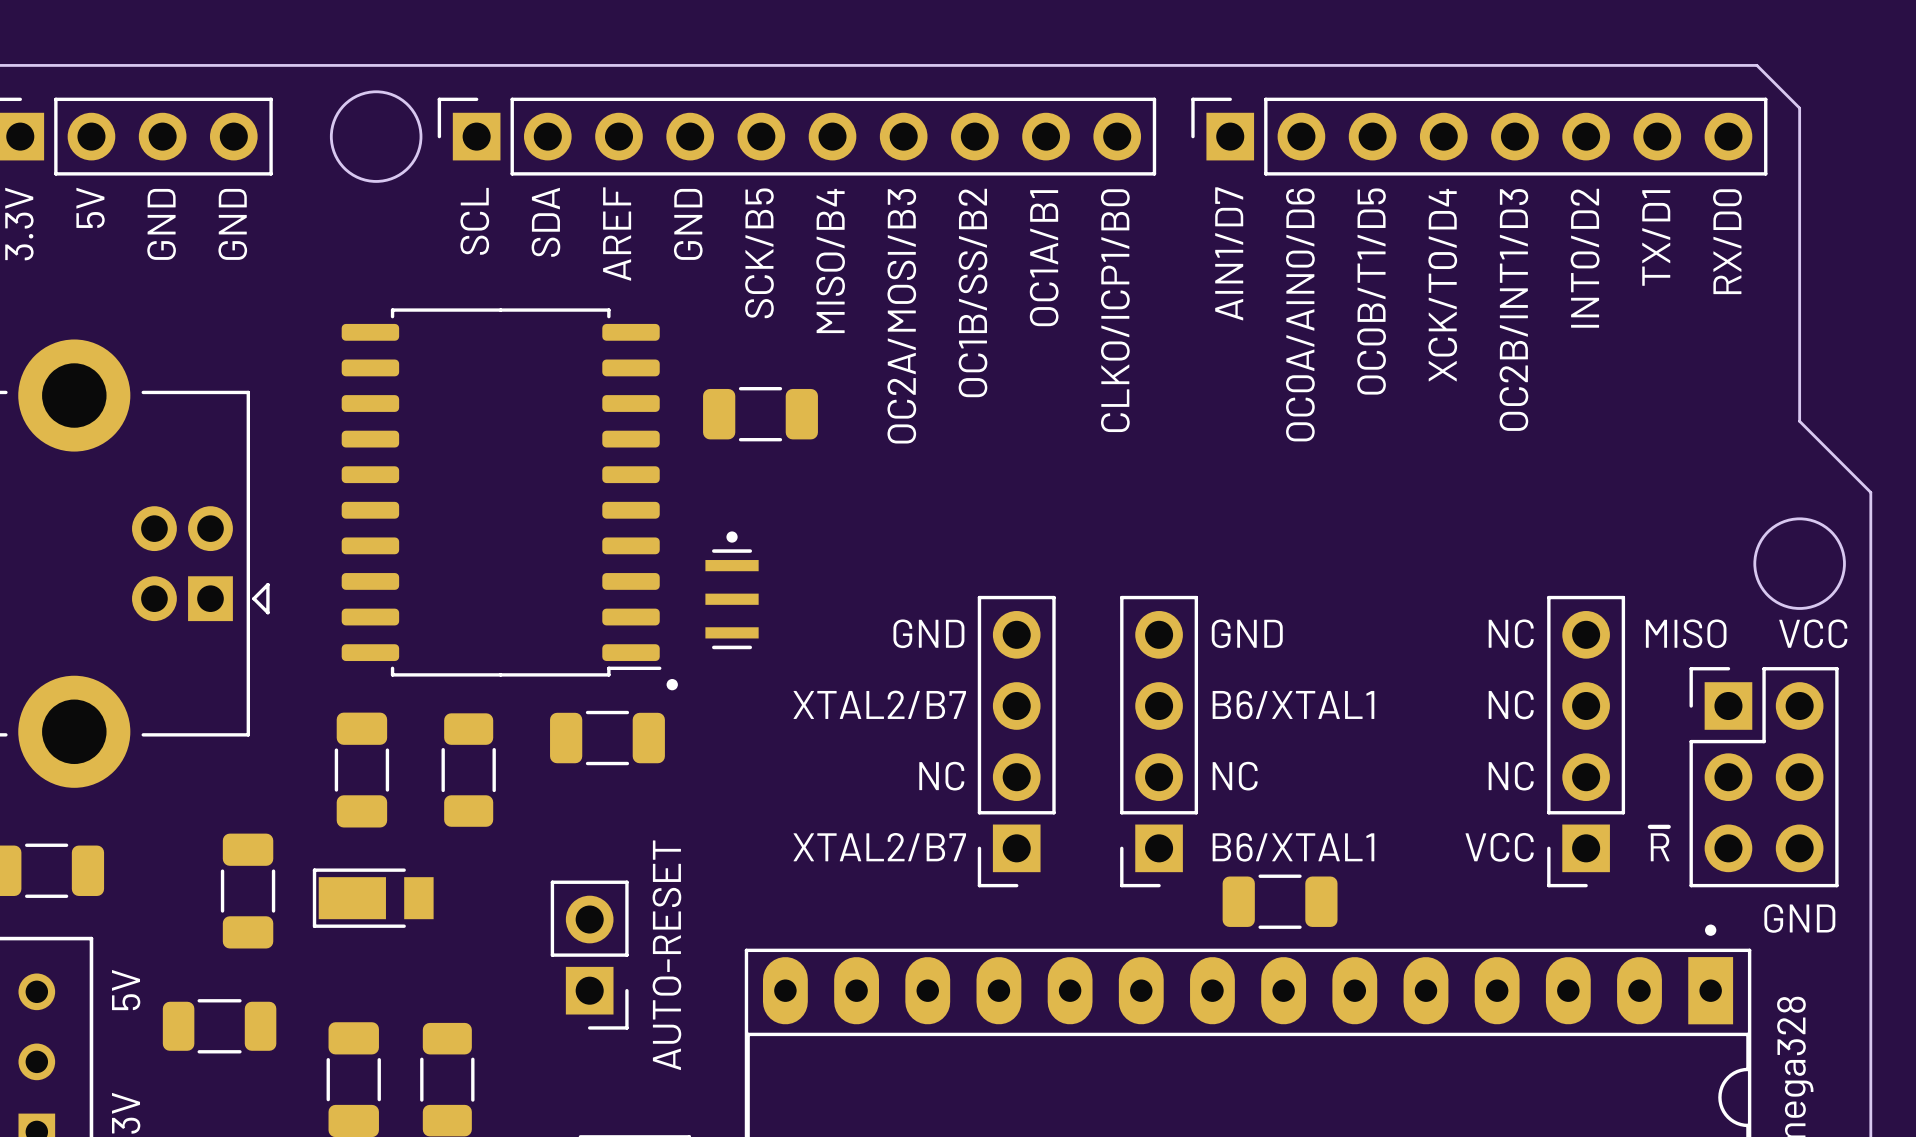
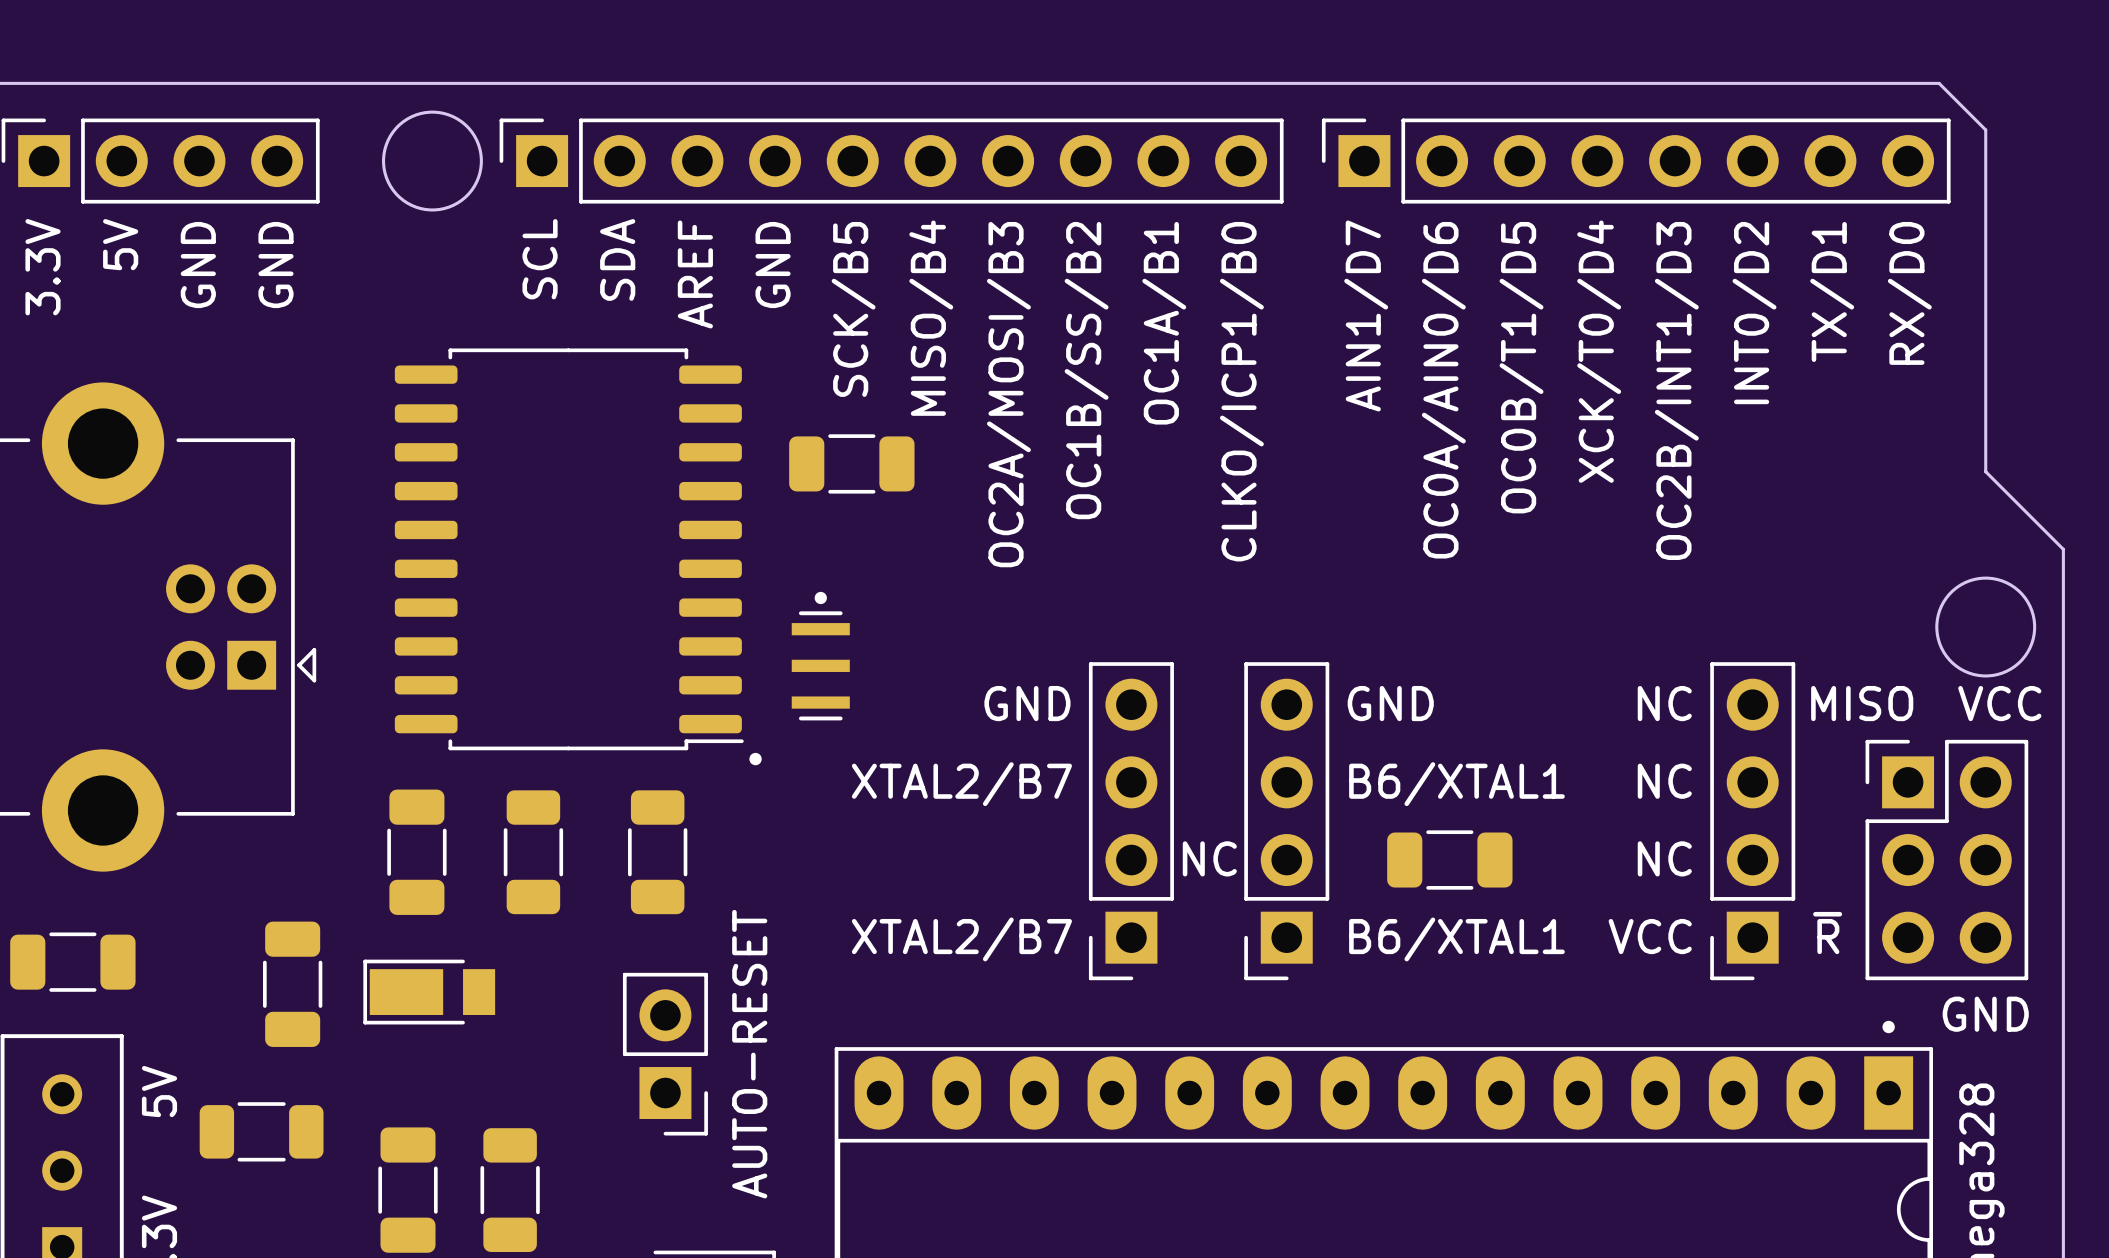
part: (607, 738) -> none
part: none -> (657, 852)
text: NC (941, 776) -> none
text: none -> NC (1209, 858)
text: NC (1235, 776) -> none
part position: (1280, 901) -> (1449, 860)

